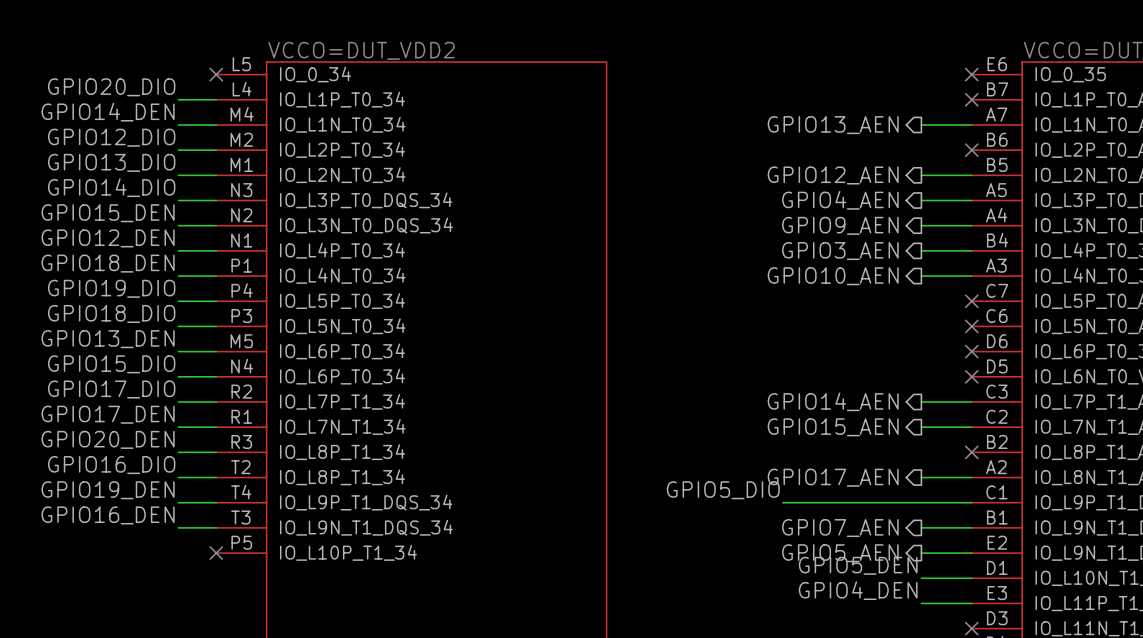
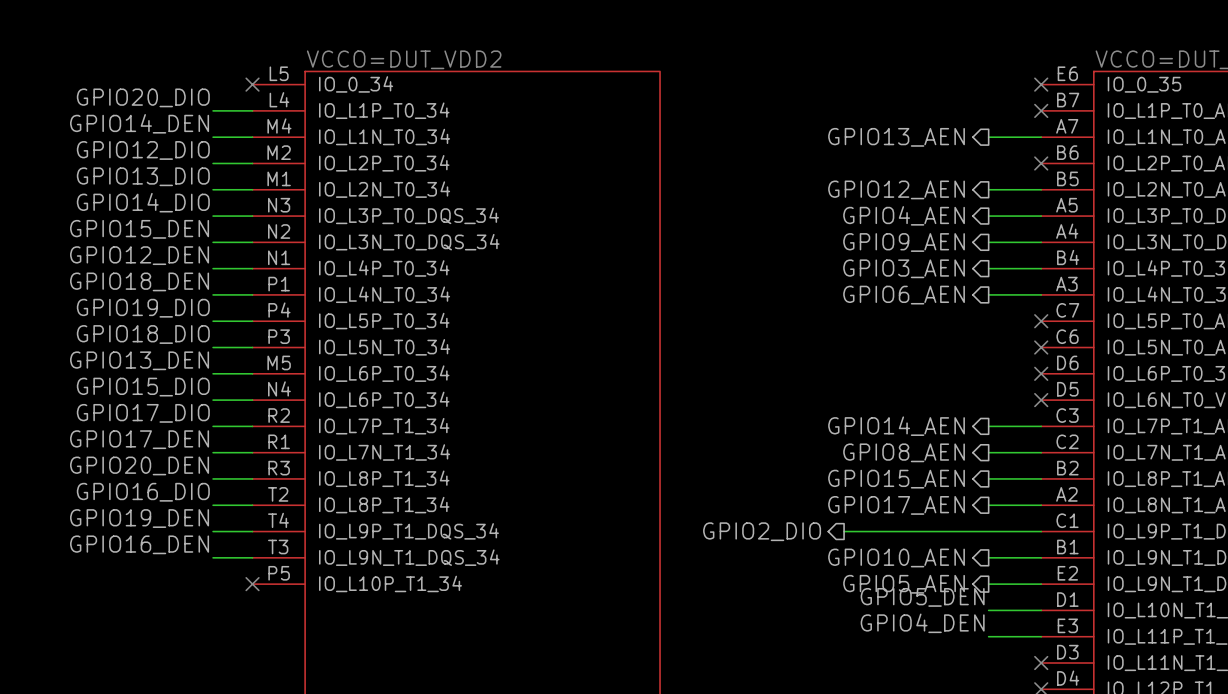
hierarchical label: GPIO10_AEN (833, 276) -> GPIO6_AEN (904, 295)
hierarchical label: GPIO15_AEN (833, 427) -> GPIO8_AEN (904, 452)
hierarchical label: none -> GPIO15_AEN (896, 479)
wire: none -> (988, 478) (1041, 478)
no-connect mark: (971, 452) -> none
label: GPIO5_DIO (723, 490) -> none
hierarchical label: none -> GPIO2_DIO (762, 531)
hierarchical label: GPIO7_AEN (840, 528) -> GPIO10_AEN (896, 558)

